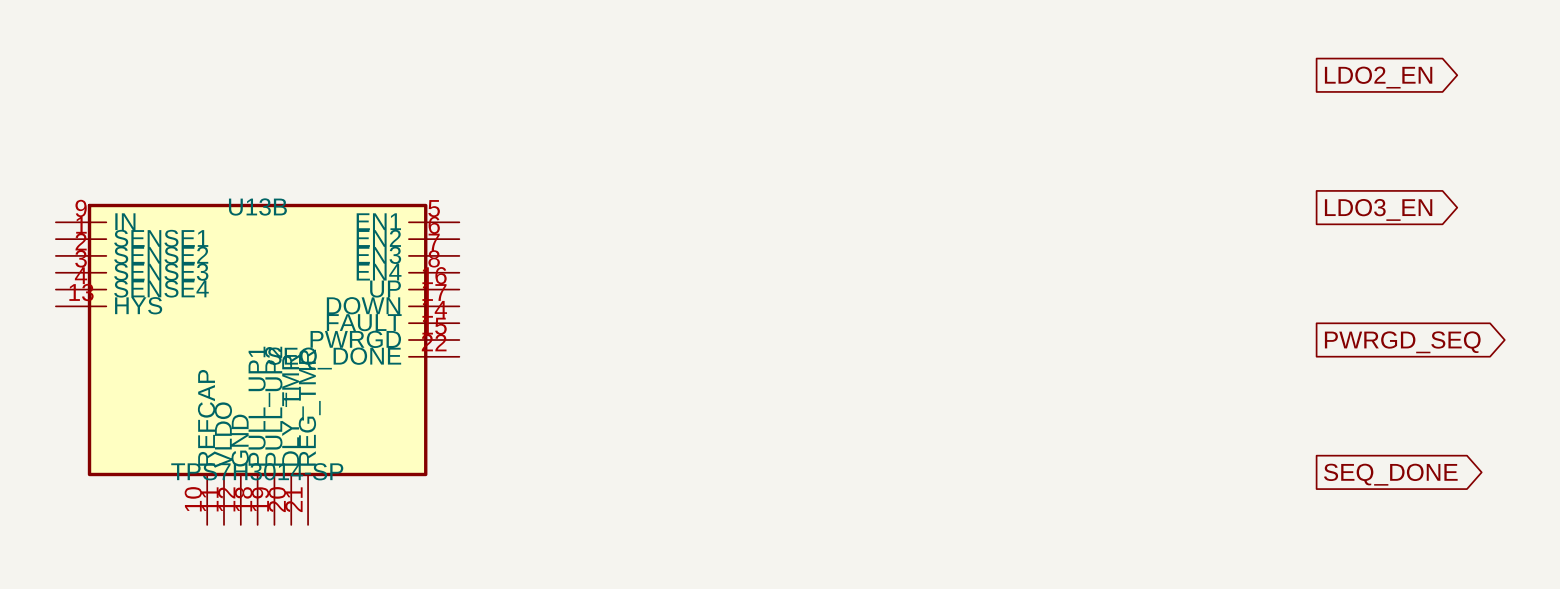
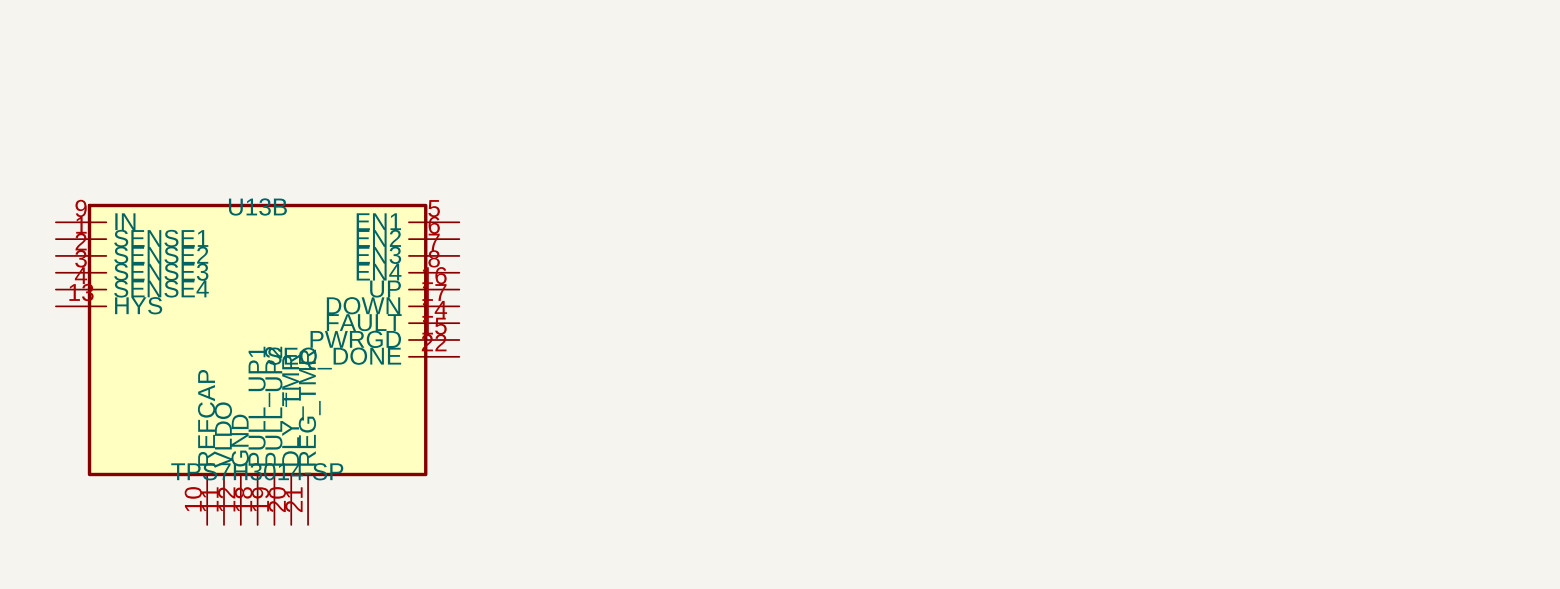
global label: LDO2_EN (1378, 77) -> none
global label: LDO3_EN (1378, 209) -> none
global label: PWRGD_SEQ (1402, 342) -> none
global label: SEQ_DONE (1390, 474) -> none

